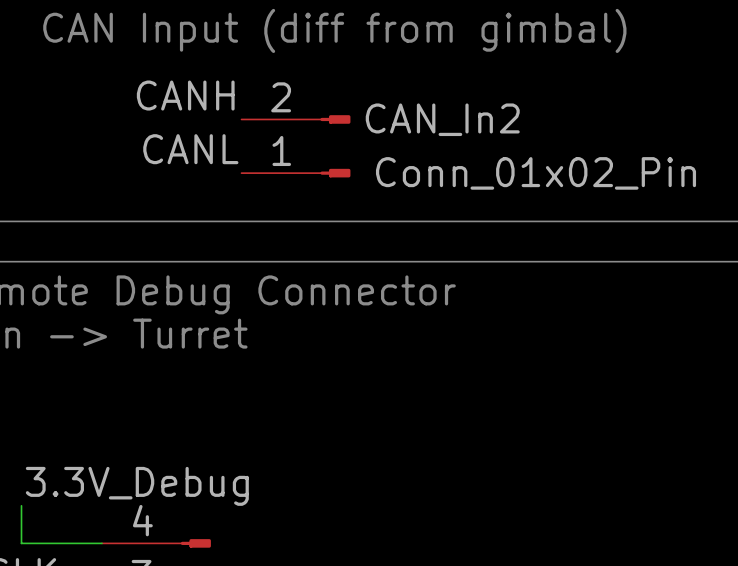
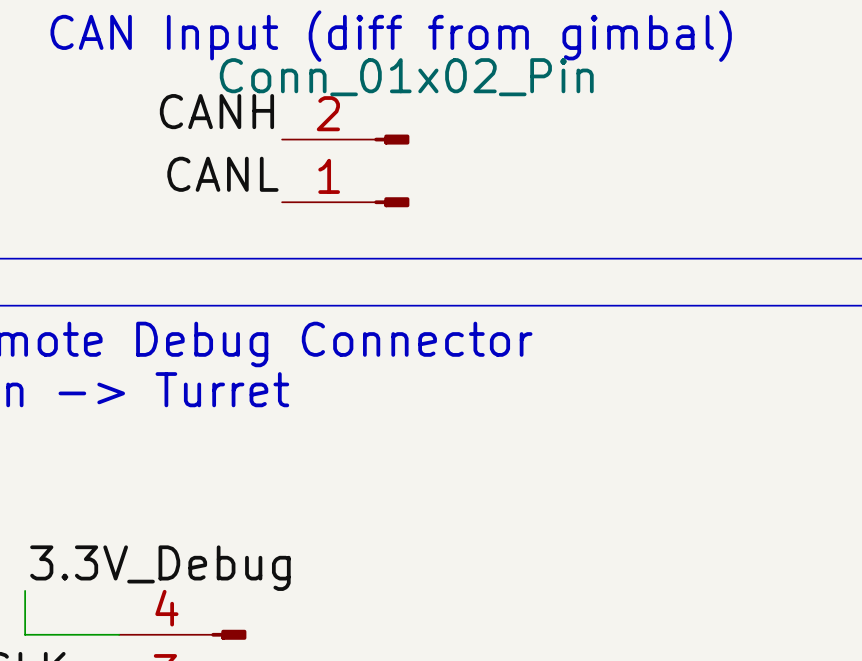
CAN_In2 name: CAN_In2 (442, 119) -> none
CAN_In2 value position: Conn_01x02_Pin (536, 173) -> Conn_01x02_Pin (406, 77)

